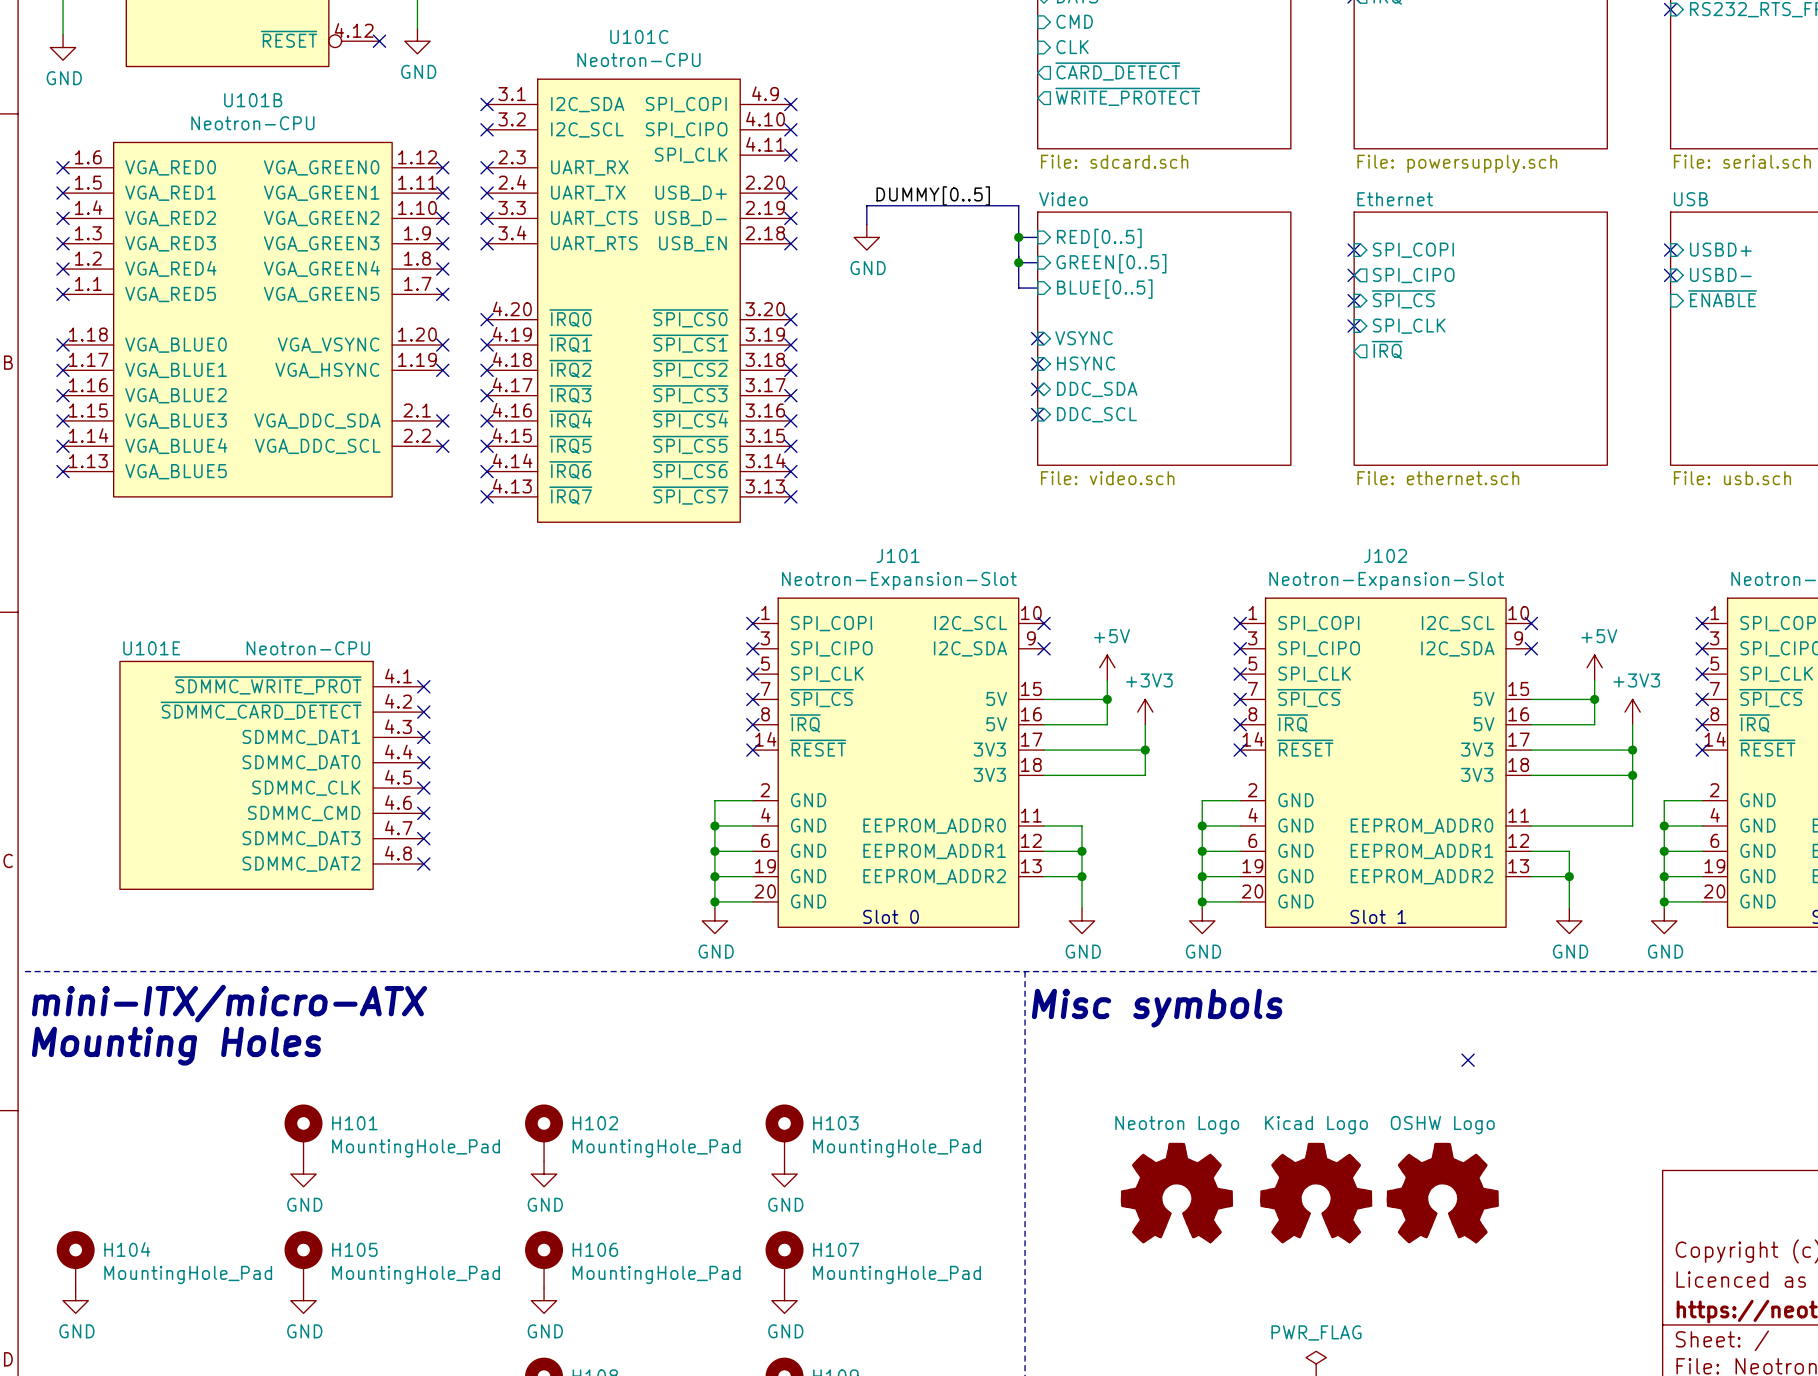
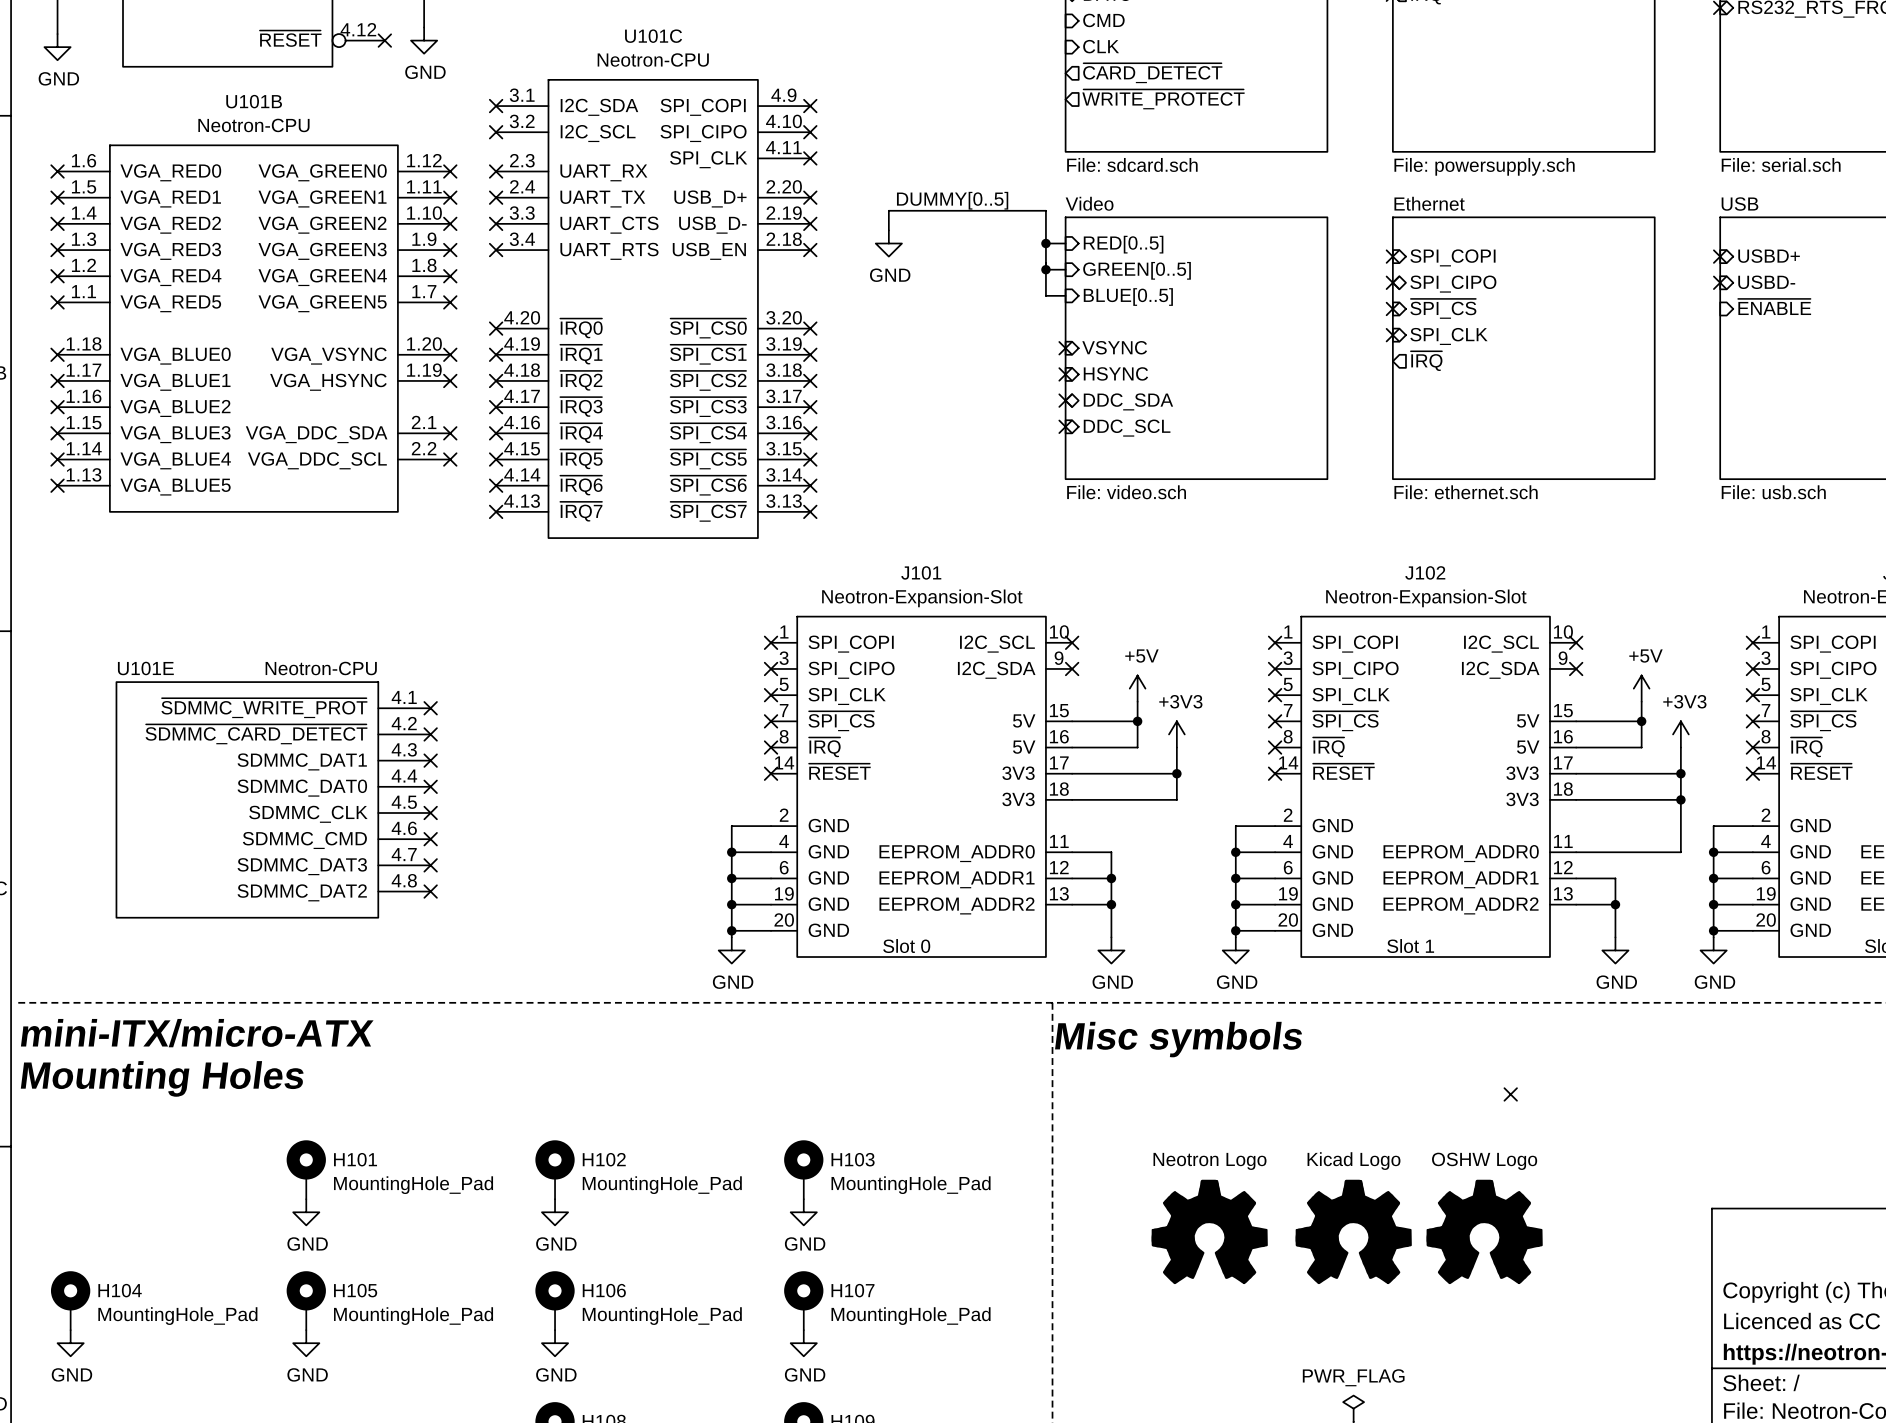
sheet pin shape: output (1413, 275) -> bidirectional (1453, 284)

